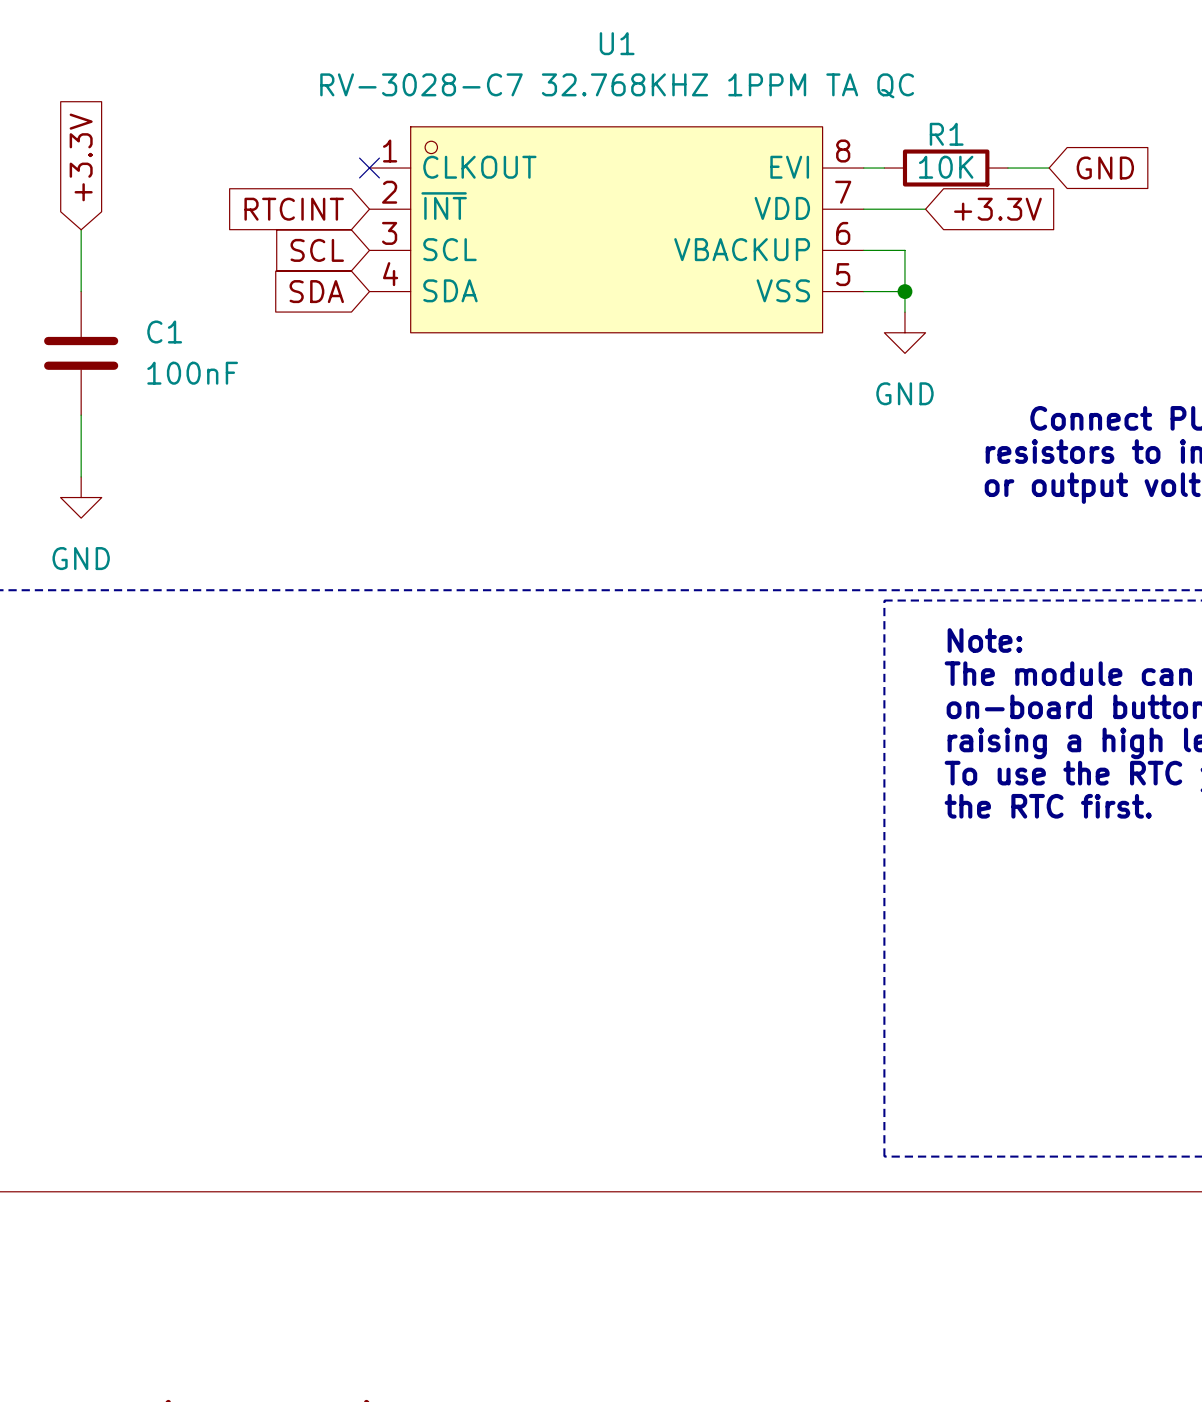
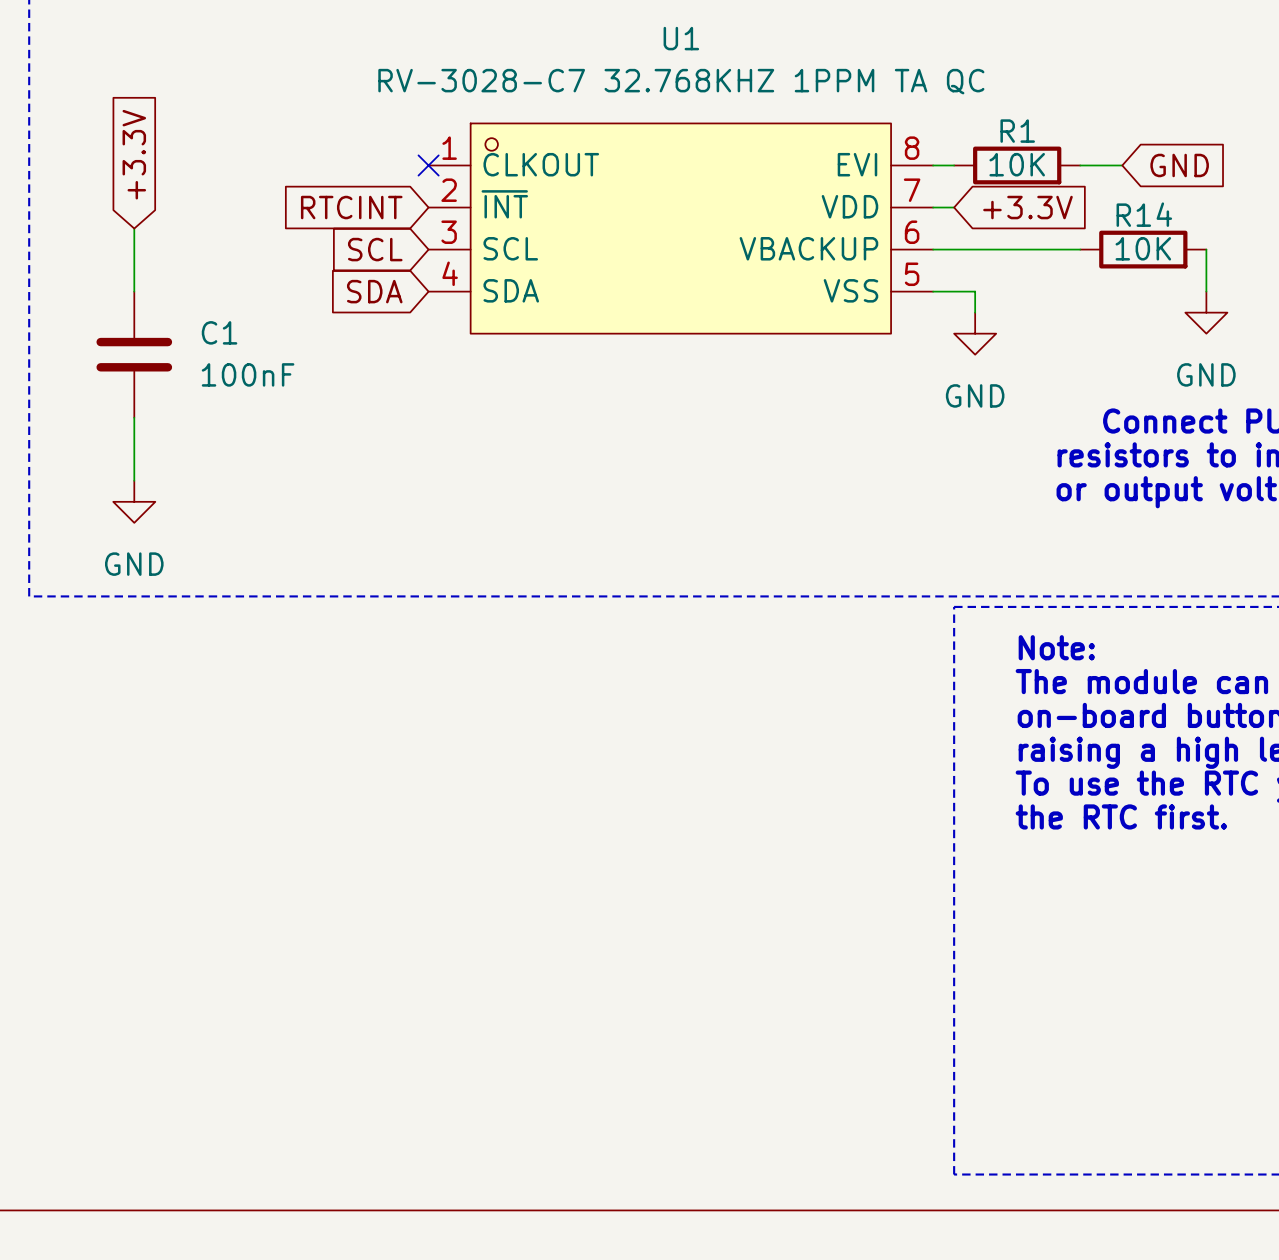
wire: (884, 209) (925, 209) -> none
global label position: +3.3V (997, 209) -> +3.3V (1027, 207)
wire: (904, 250) (904, 291) -> (975, 249) (1080, 249)
R14: none -> 10K (1143, 249)
wire: none -> (1206, 249) (1206, 291)
junction: (904, 291) -> none
power symbol: none -> GND (1206, 312)

